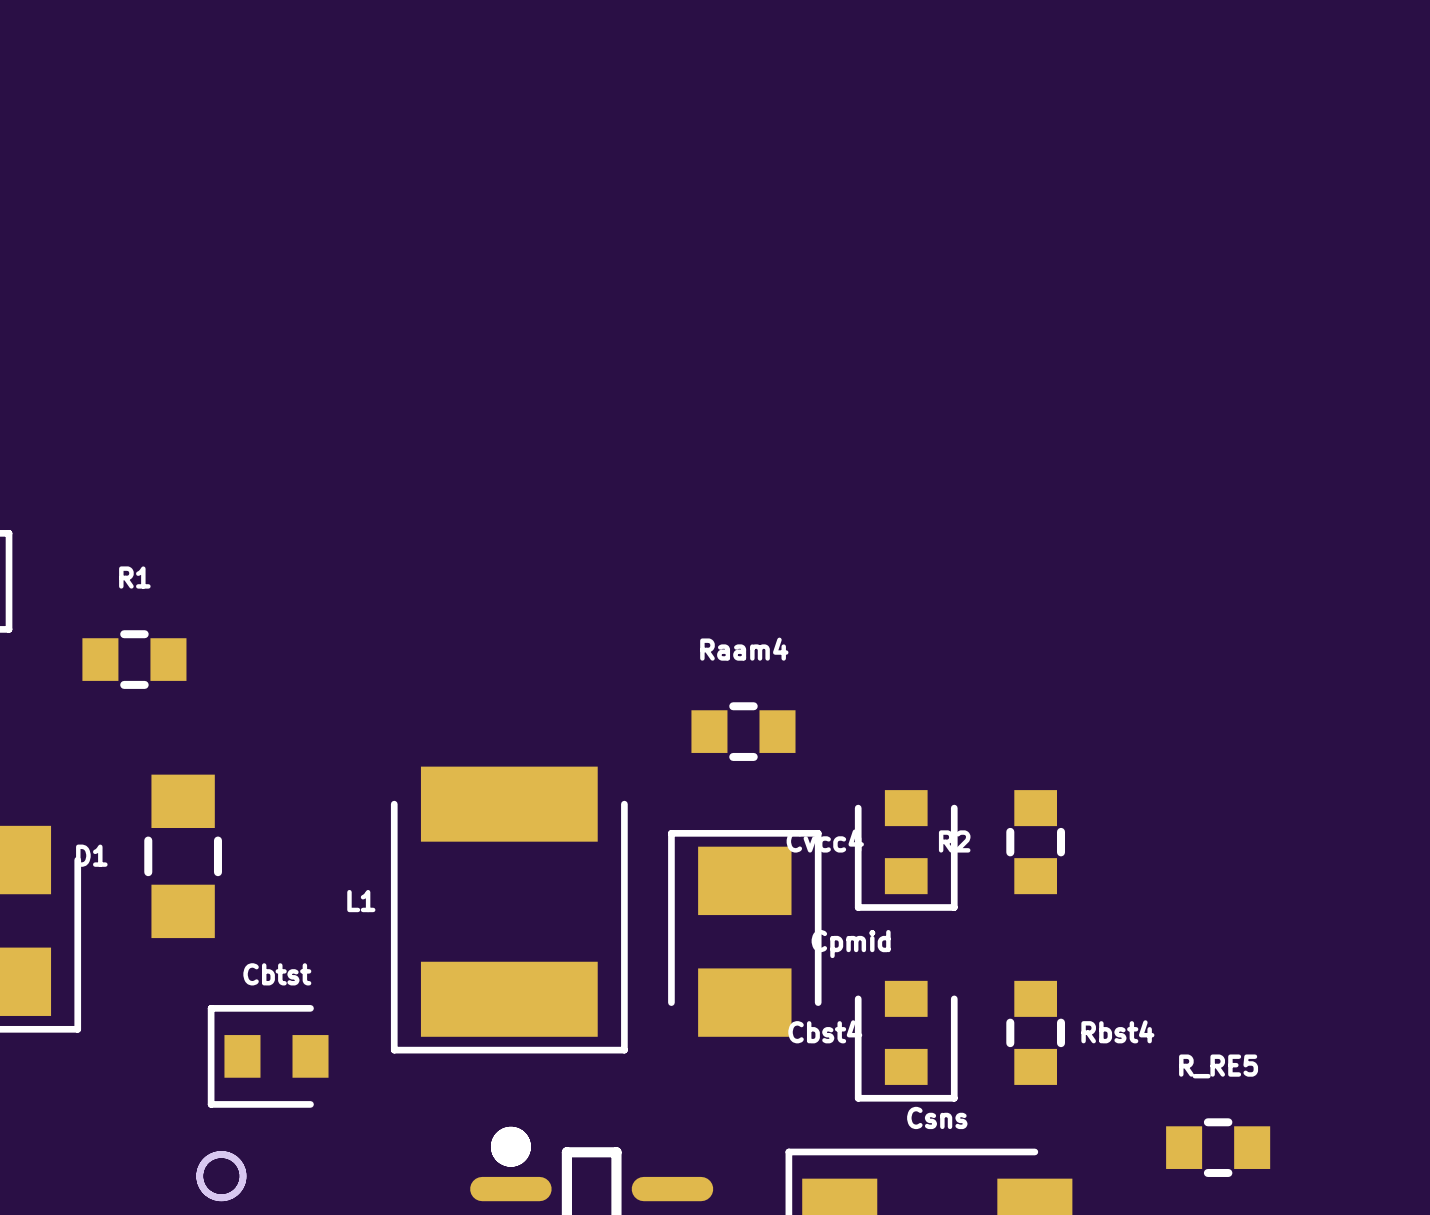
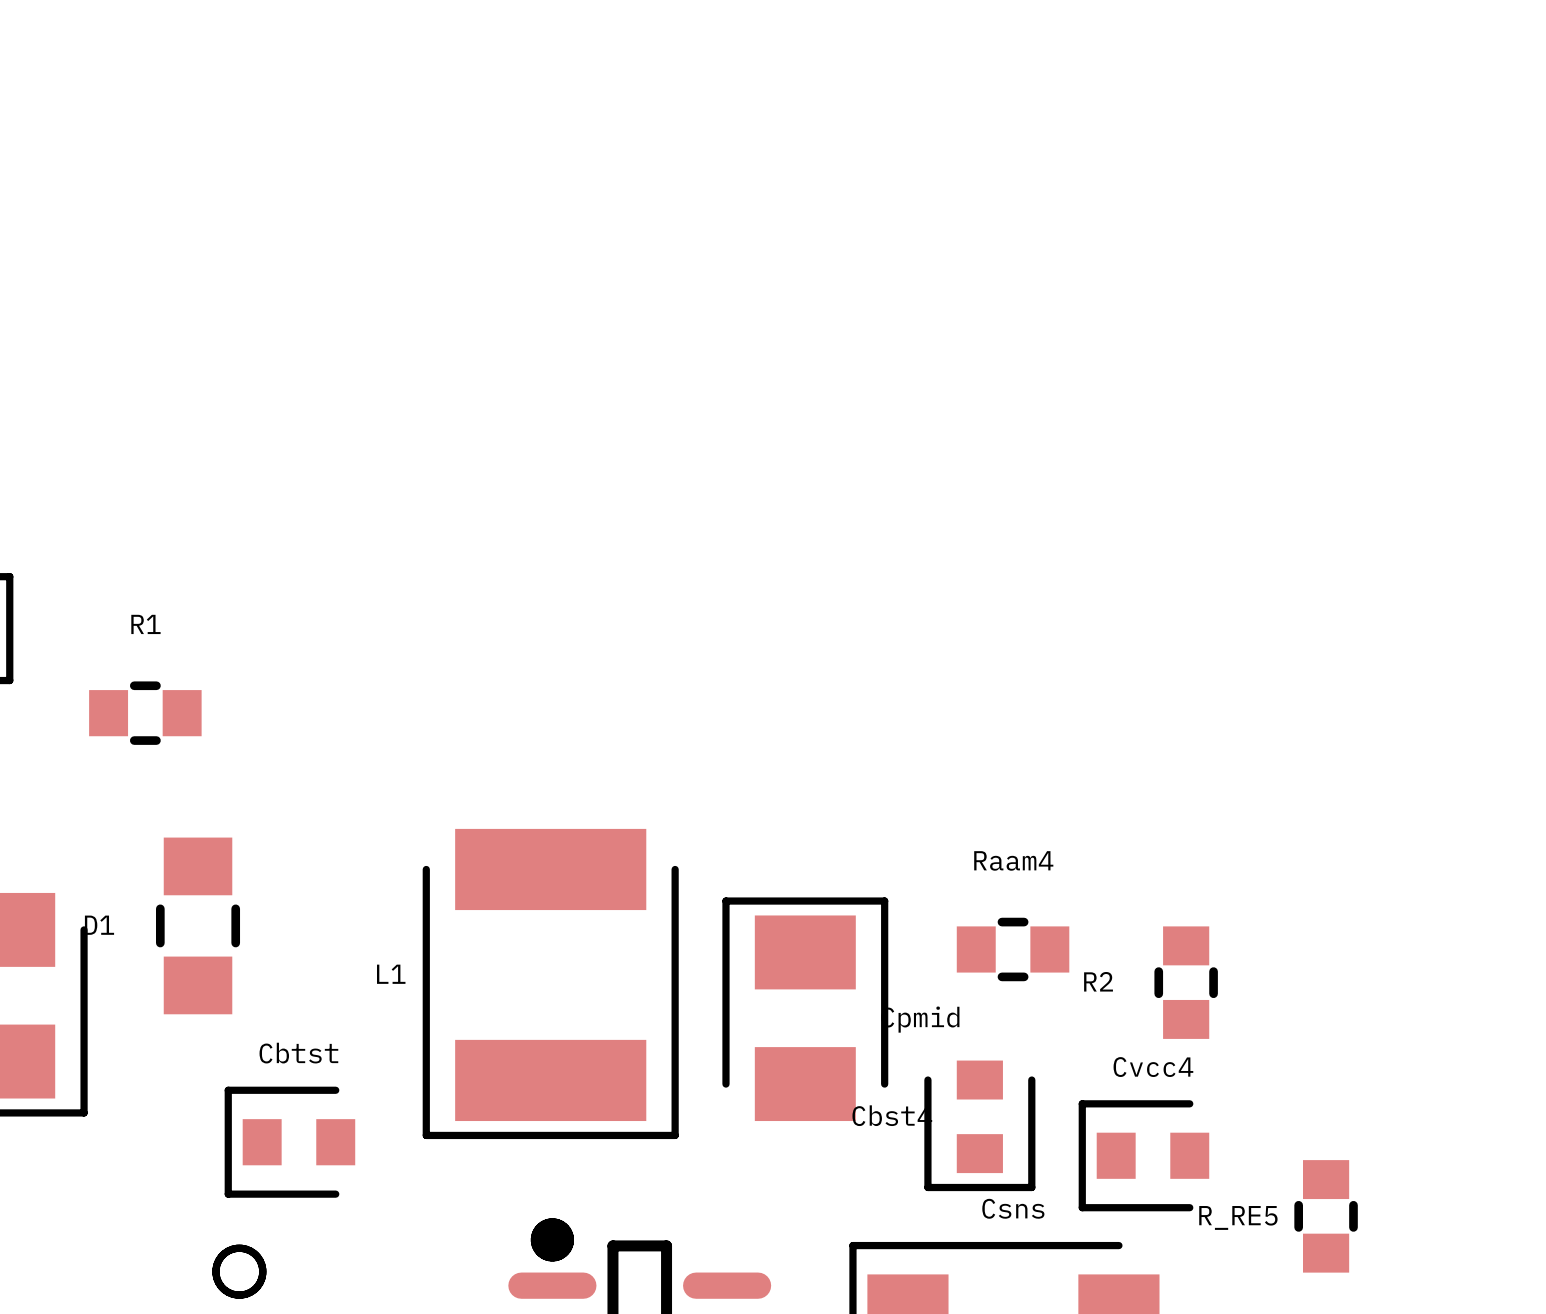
Raam4 position: (743, 731) -> (1013, 949)
R2 position: (1035, 842) -> (1186, 982)
Cvcc4 rotation: 0° (906, 850) -> 90° clockwise (1143, 1155)
Cvcc4 position: (906, 850) -> (1143, 1155)
Rbst4: (1035, 1032) -> none
R_RE5 rotation: 0° (1218, 1147) -> 90° clockwise (1326, 1216)

